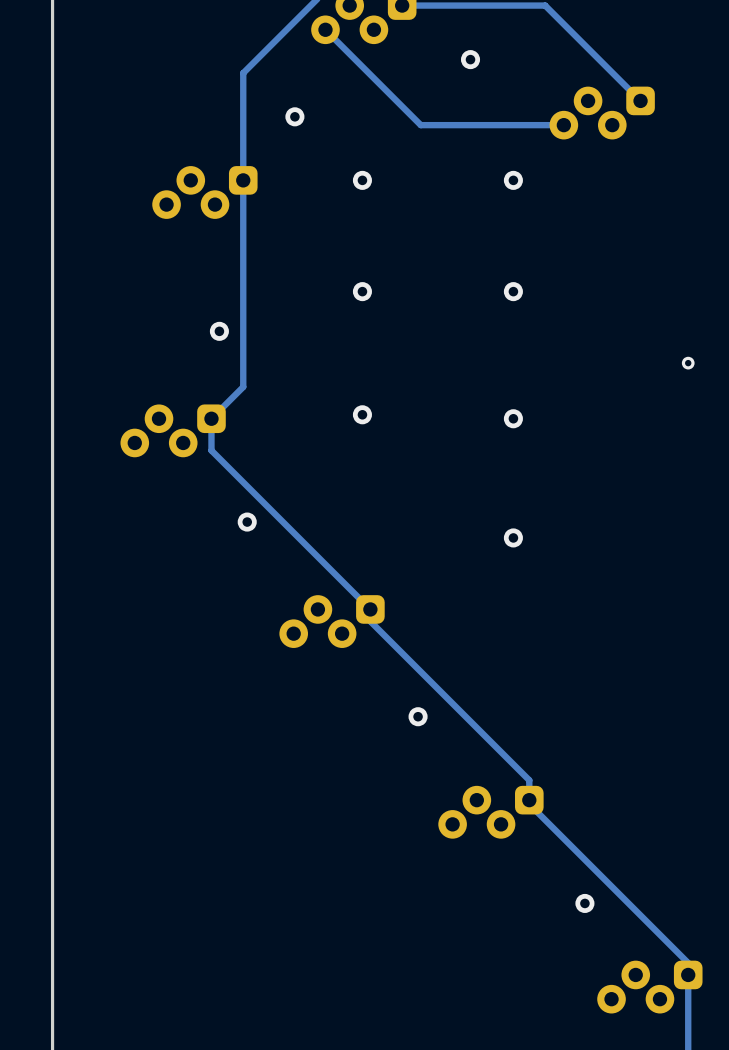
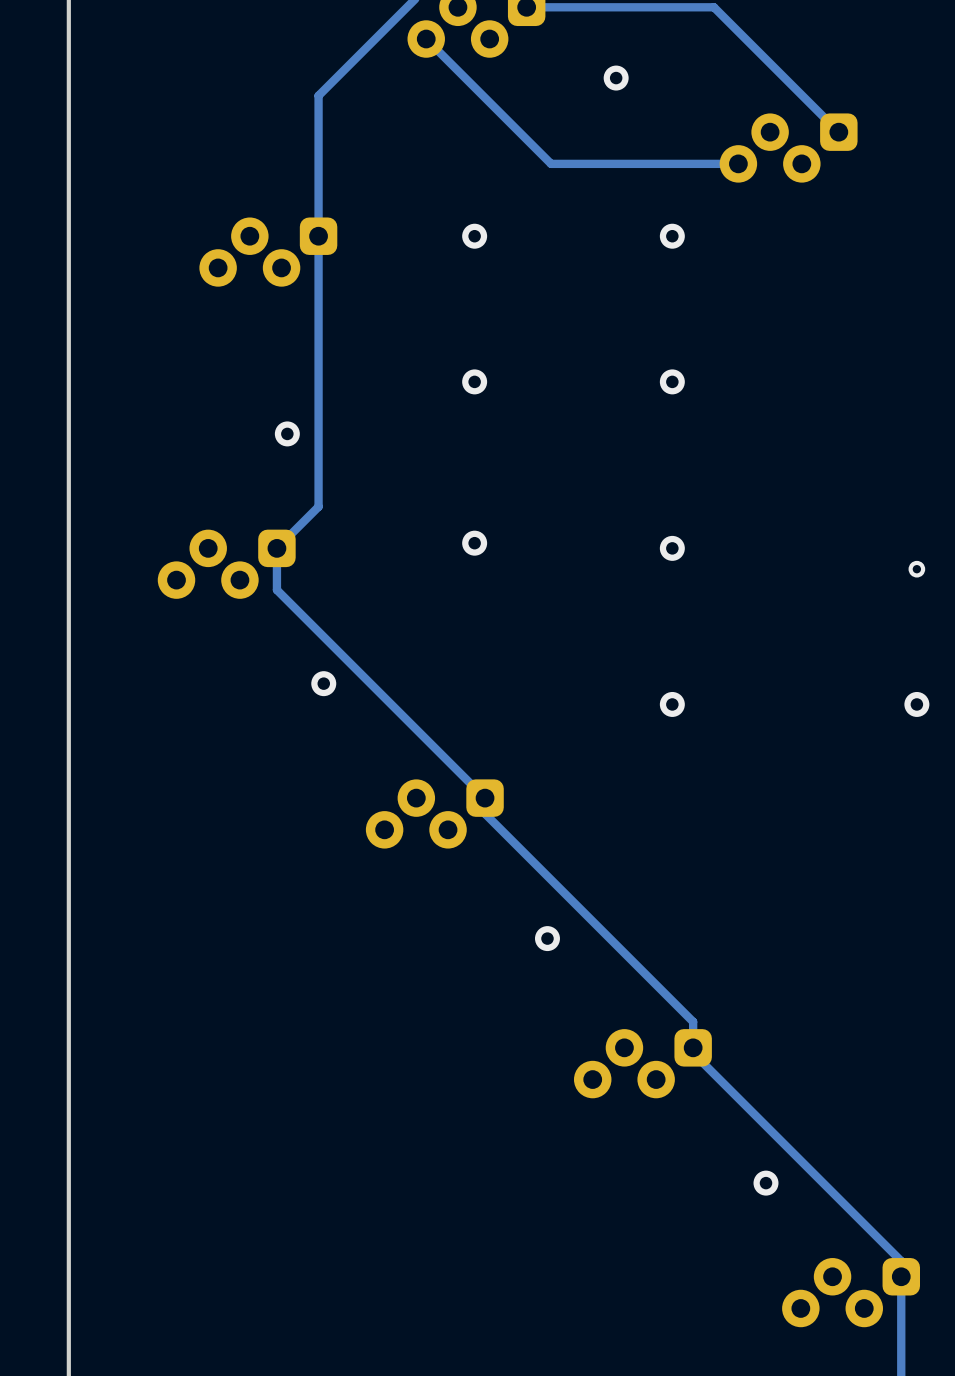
via: (294, 116) -> none
via position: (688, 363) -> (916, 569)
via: none -> (916, 704)

